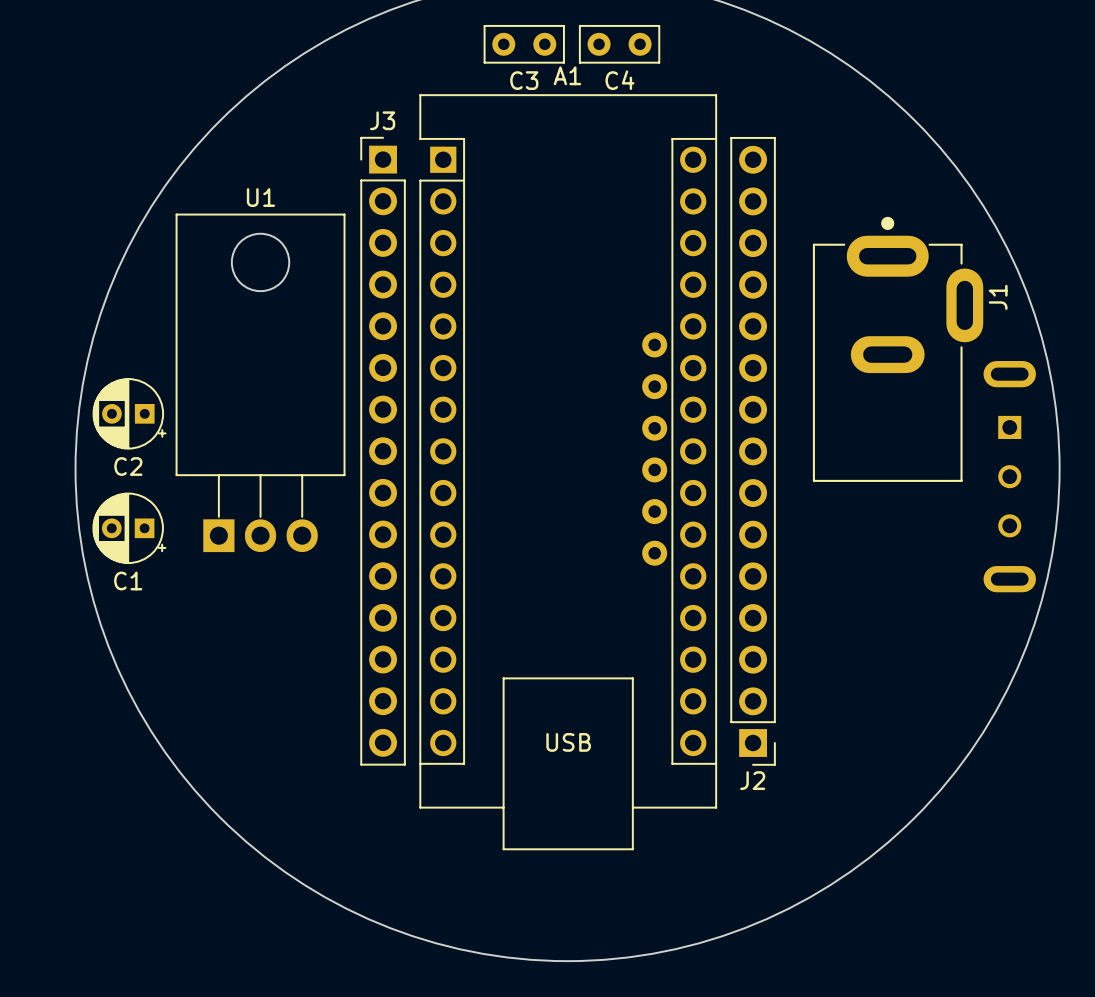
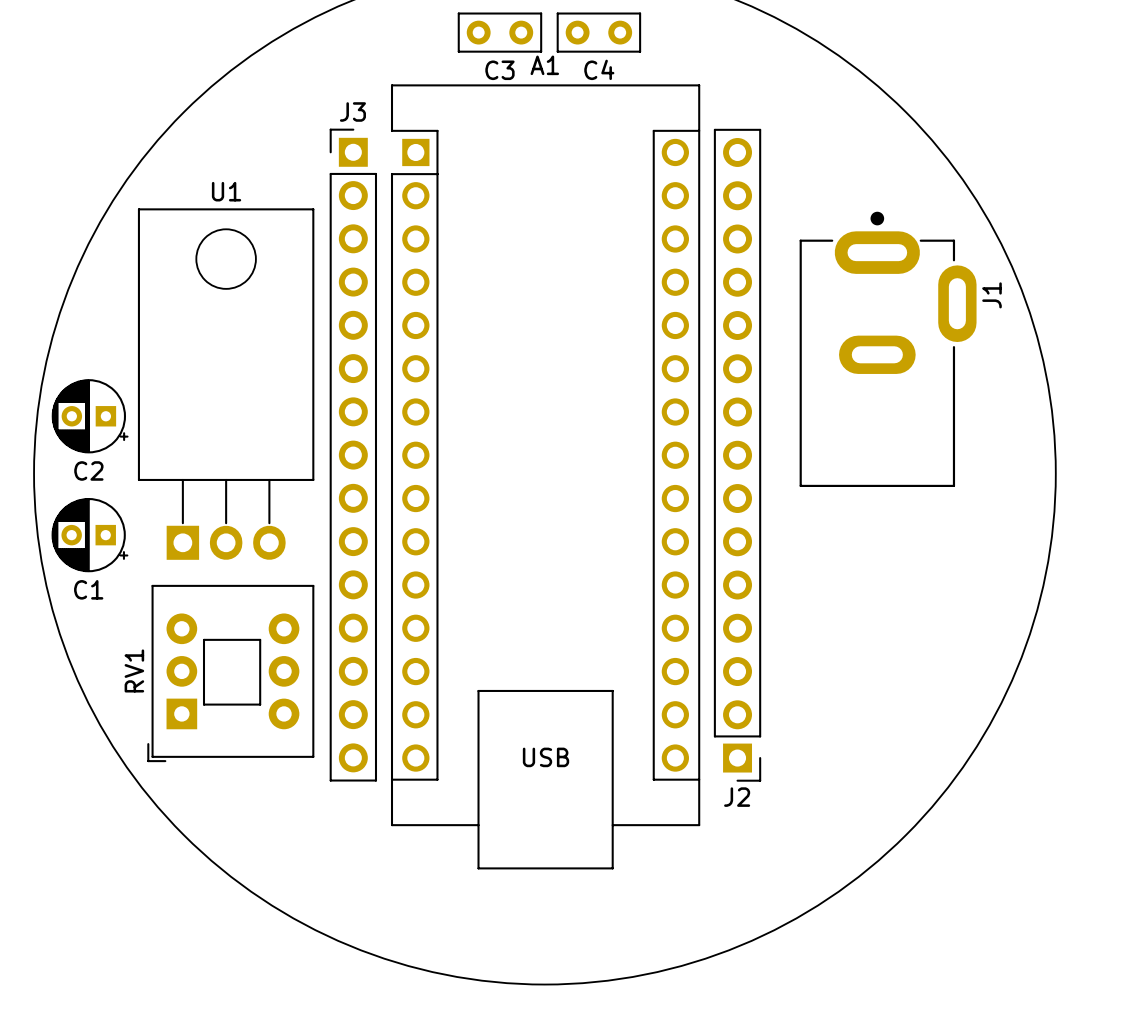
part: (654, 449) -> none
part: (1009, 476) -> none
RV1: none -> (230, 673)

